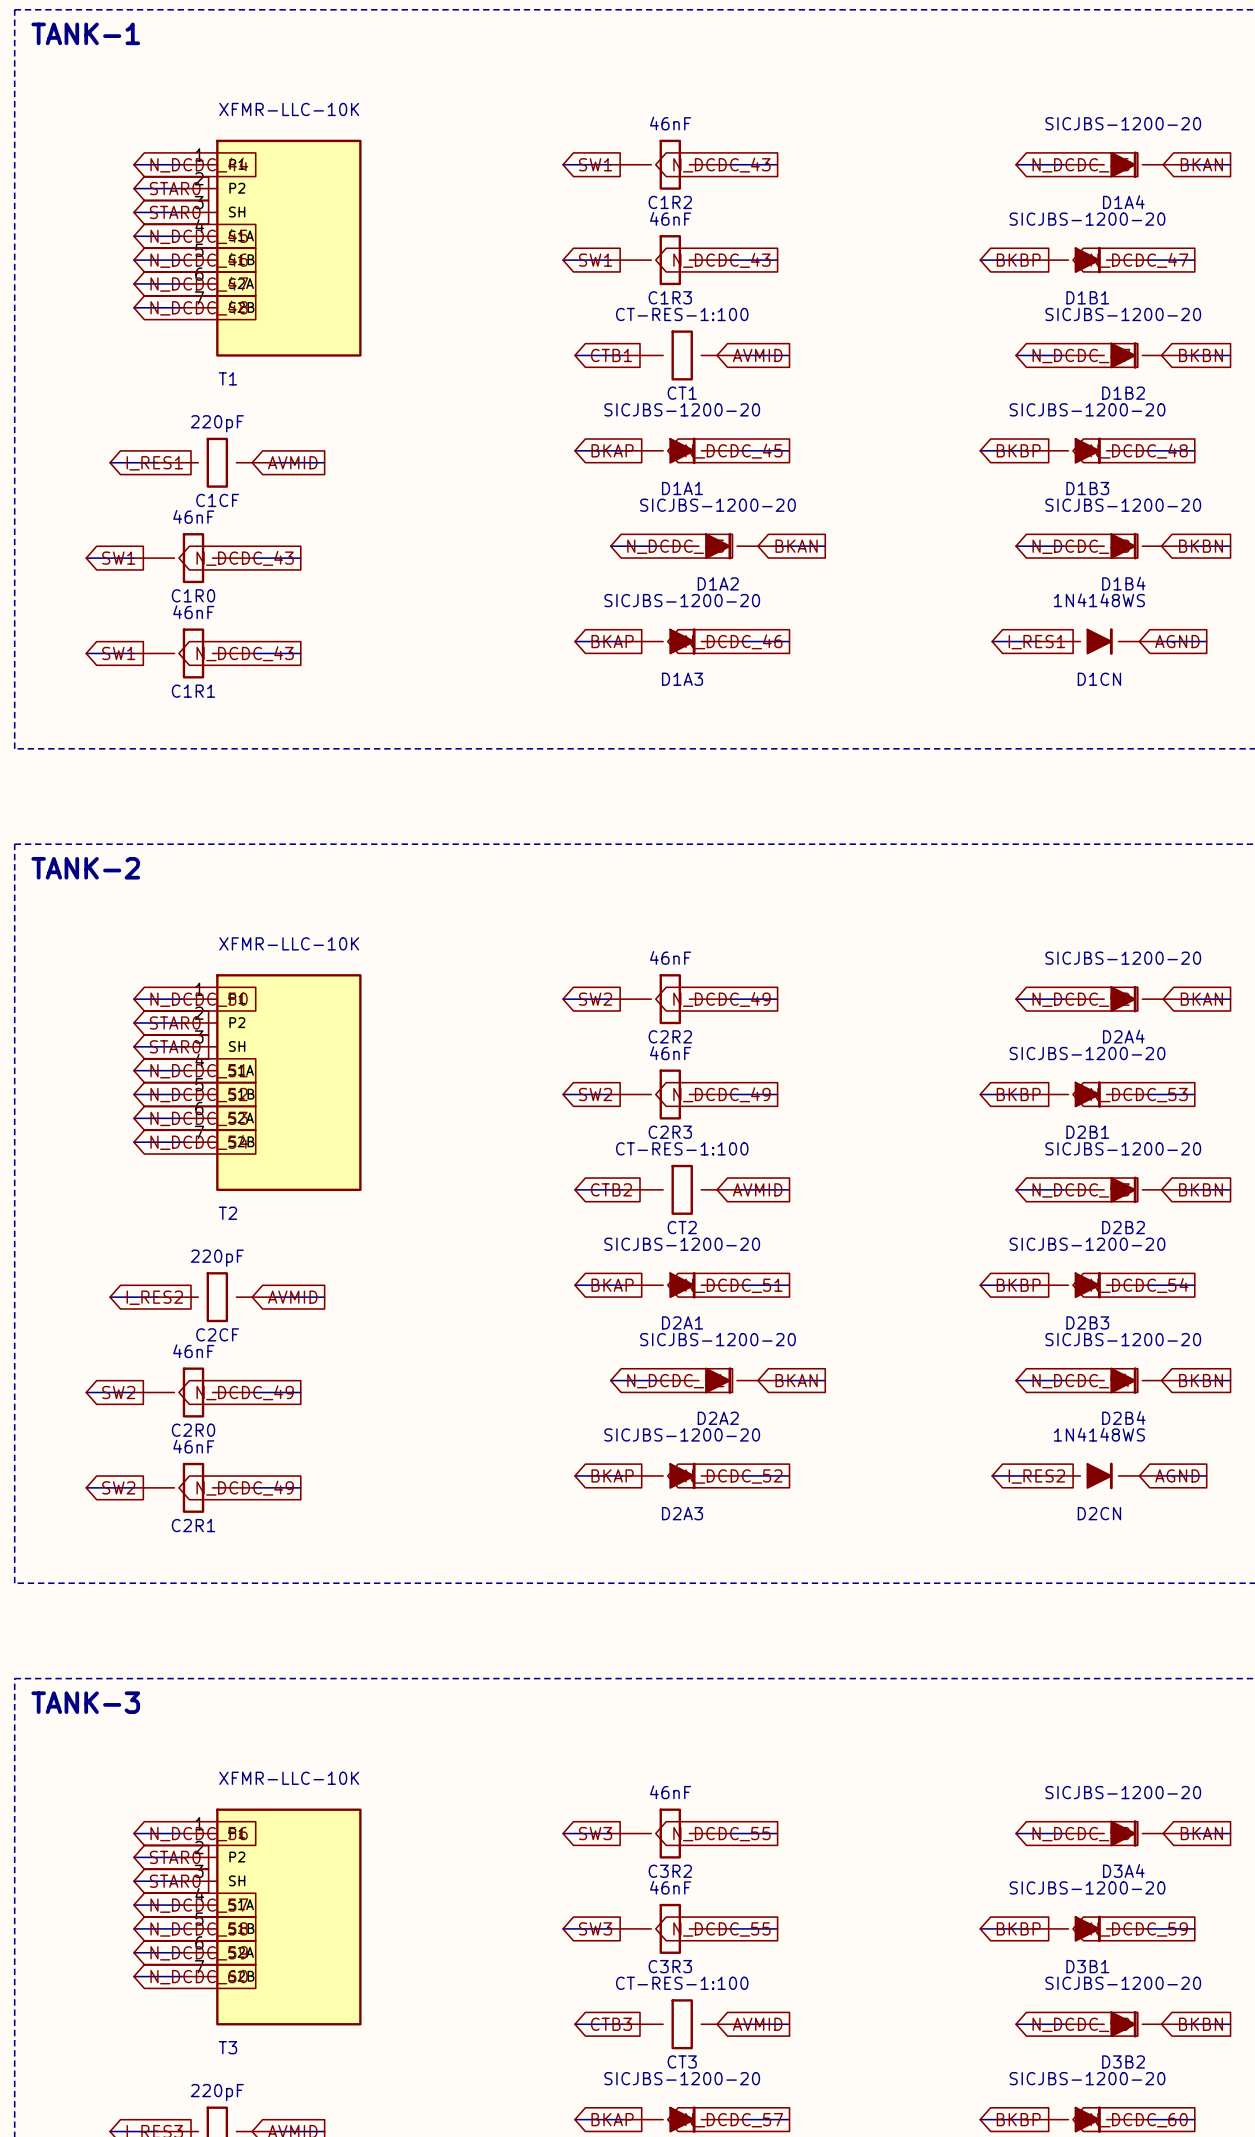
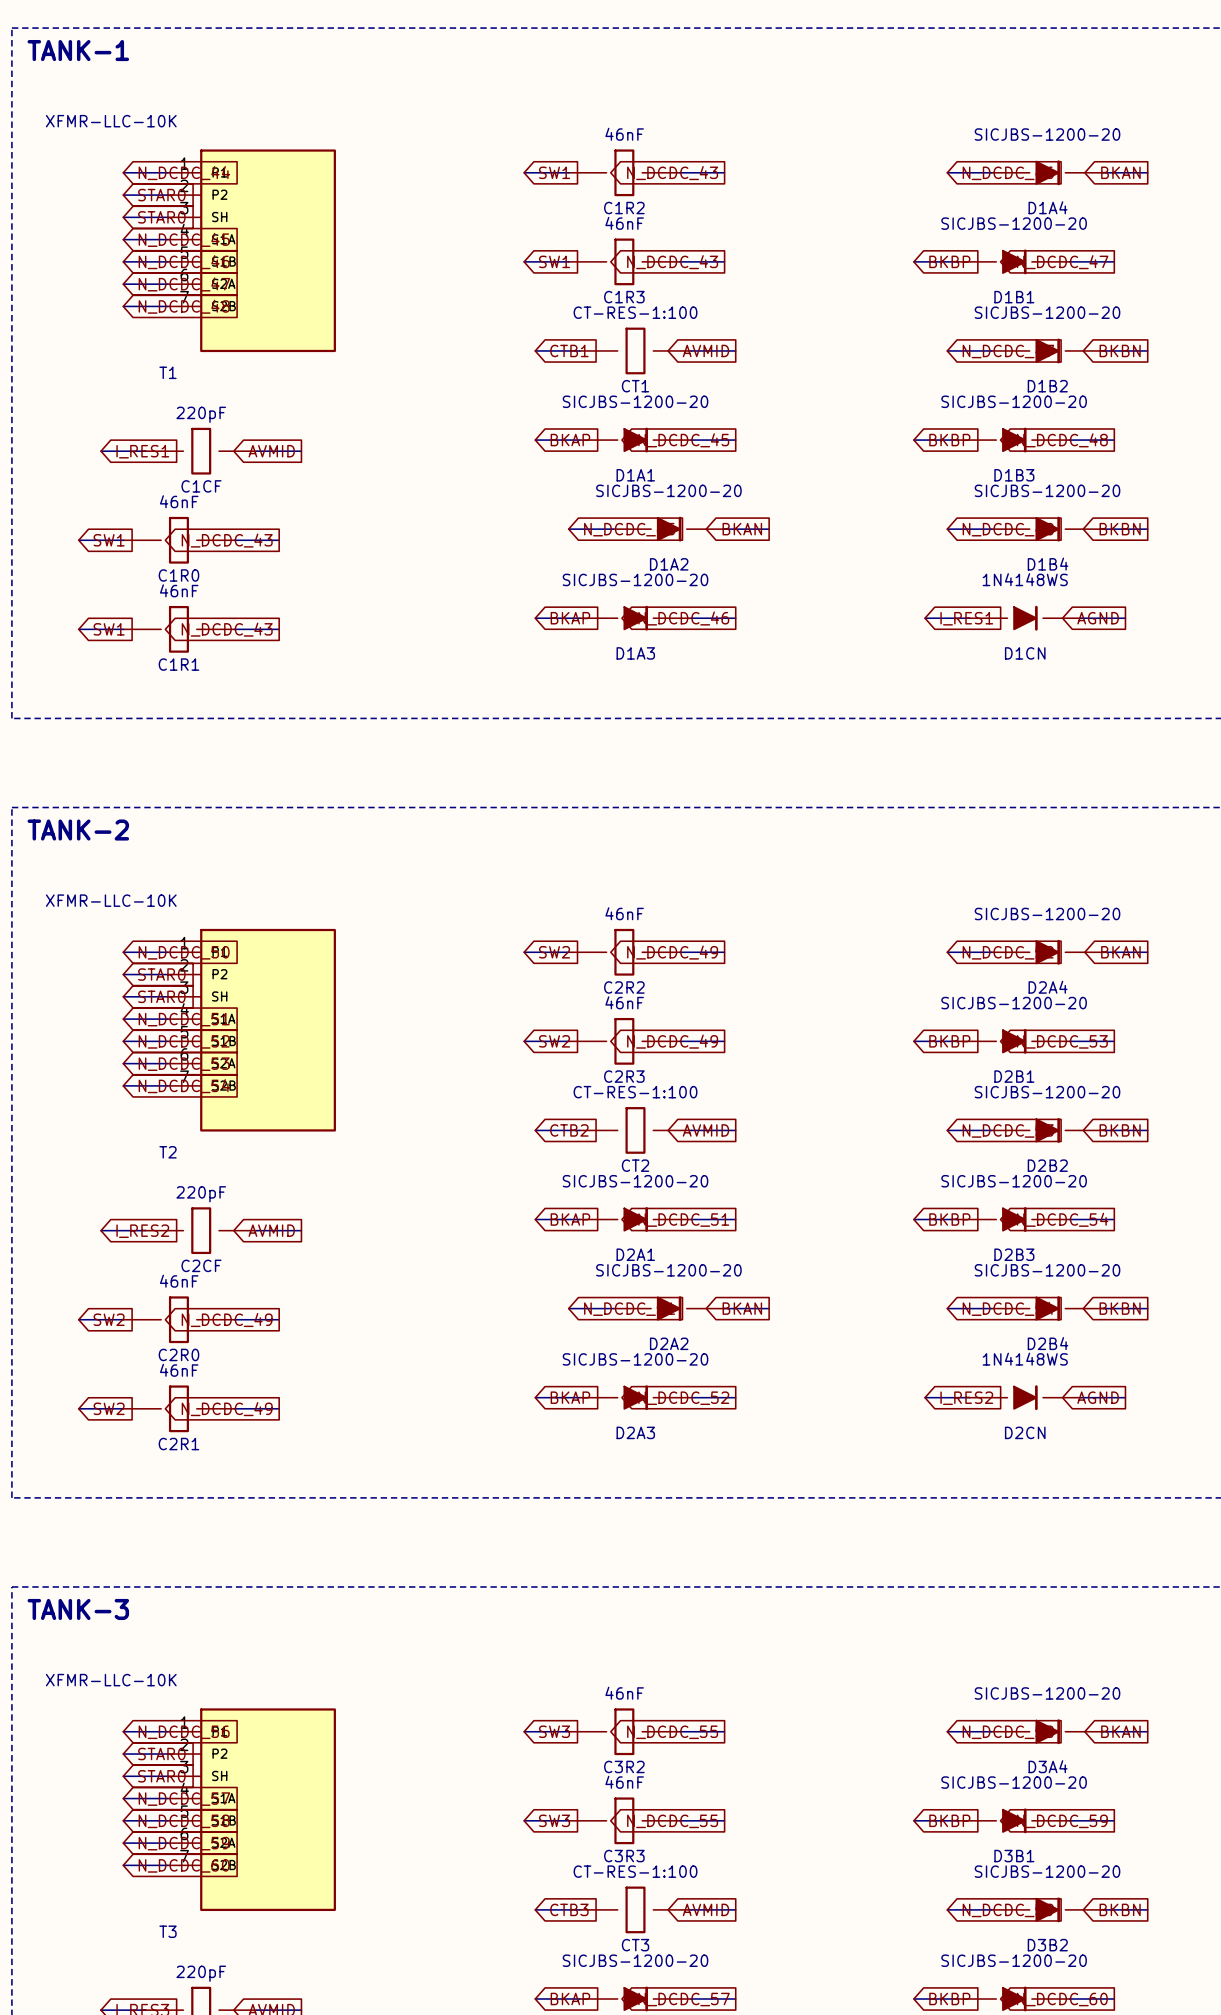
T1 value position: XFMR-LLC-10K (289, 109) -> XFMR-LLC-10K (111, 121)
T1 name position: T1 (227, 378) -> T1 (168, 372)
T2 value position: XFMR-LLC-10K (289, 943) -> XFMR-LLC-10K (111, 900)
T2 name position: T2 (227, 1213) -> T2 (168, 1152)
T3 value position: XFMR-LLC-10K (289, 1778) -> XFMR-LLC-10K (111, 1680)
T3 name position: T3 (227, 2047) -> T3 (168, 1931)

